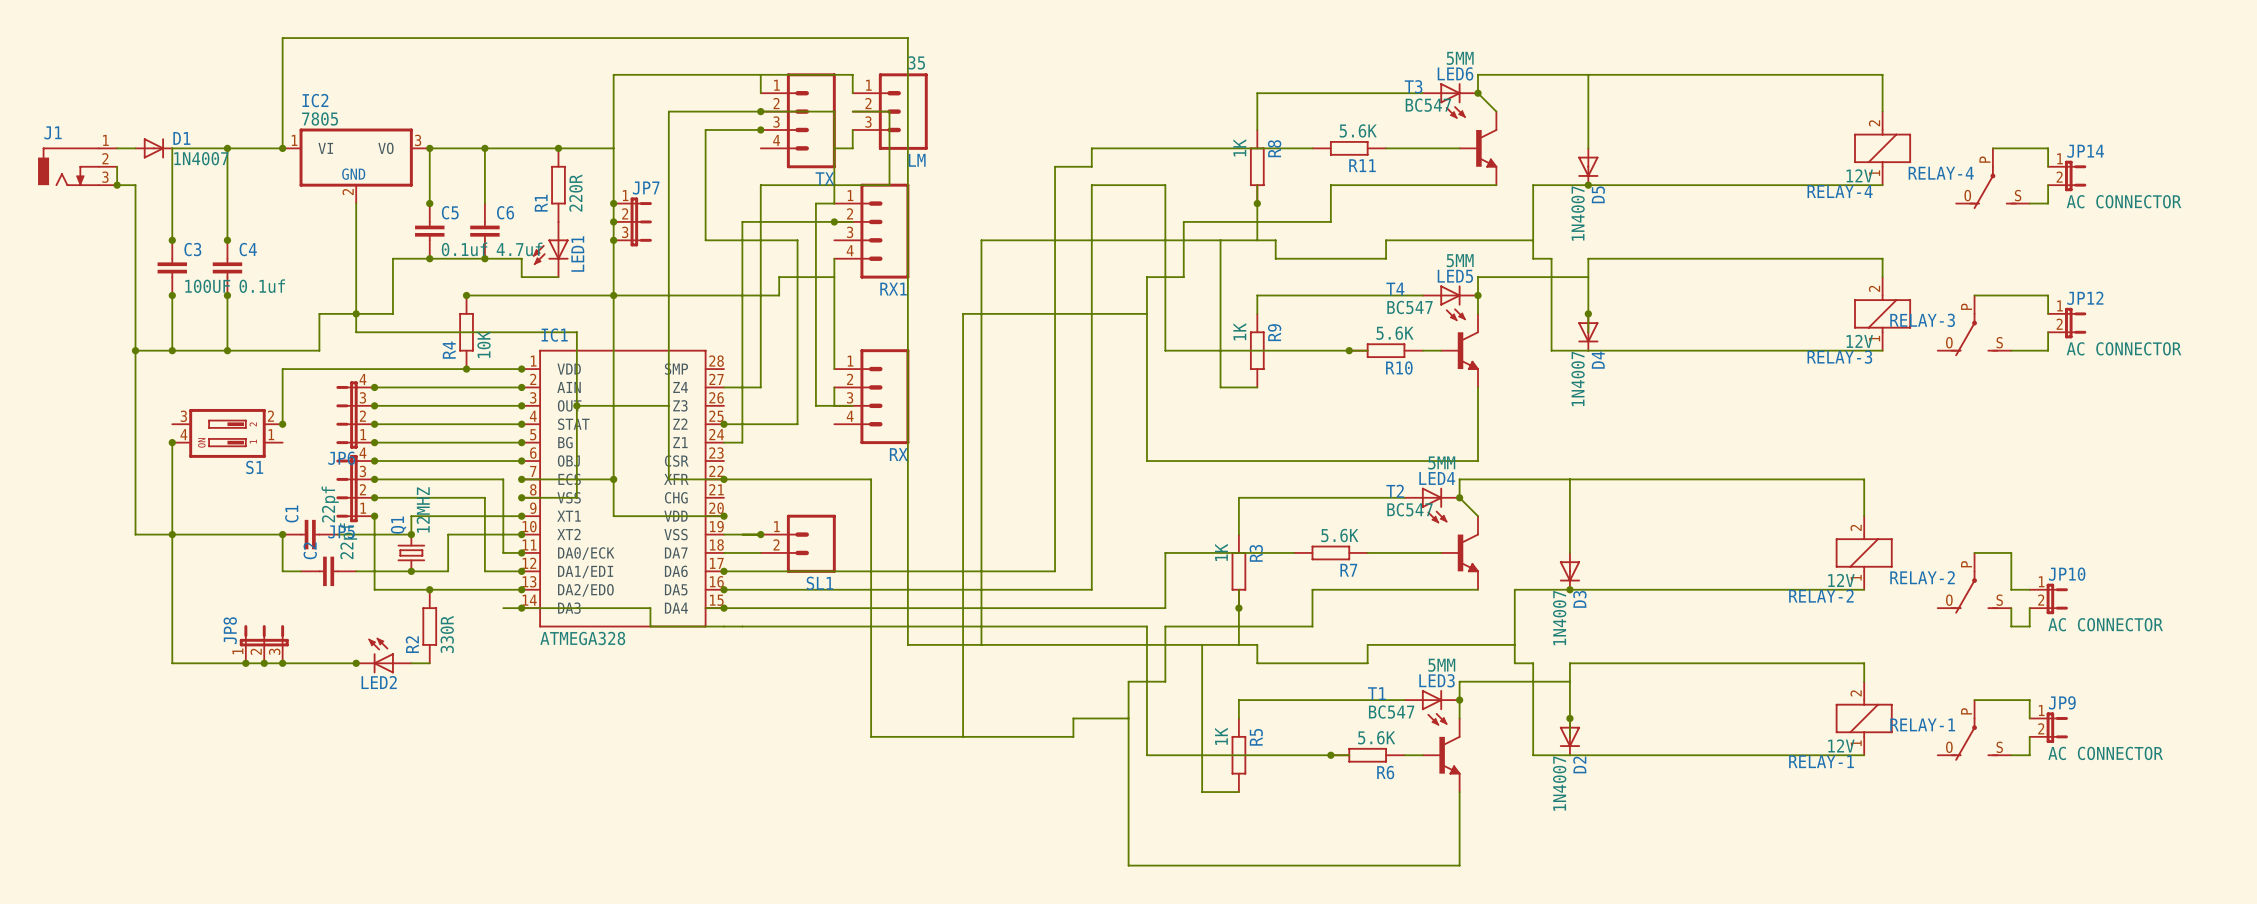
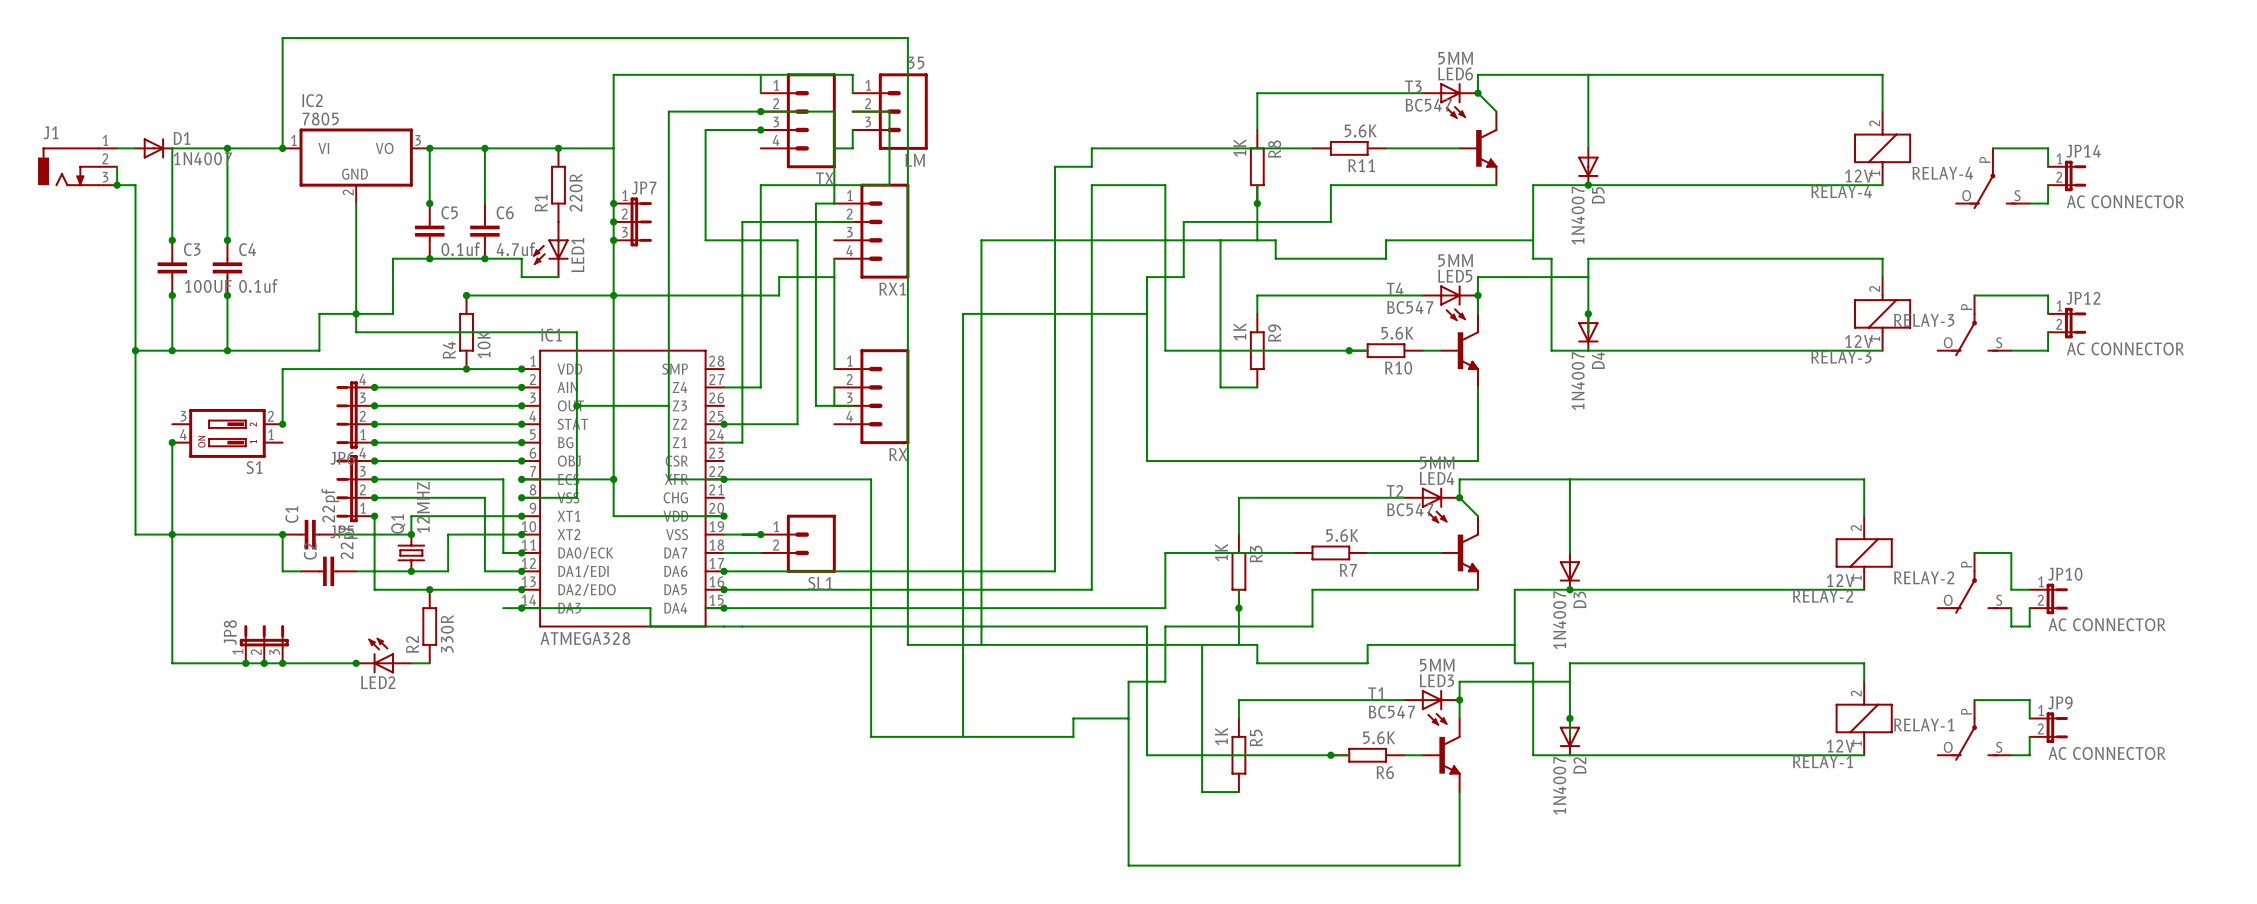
junction: (834, 221) -> none

